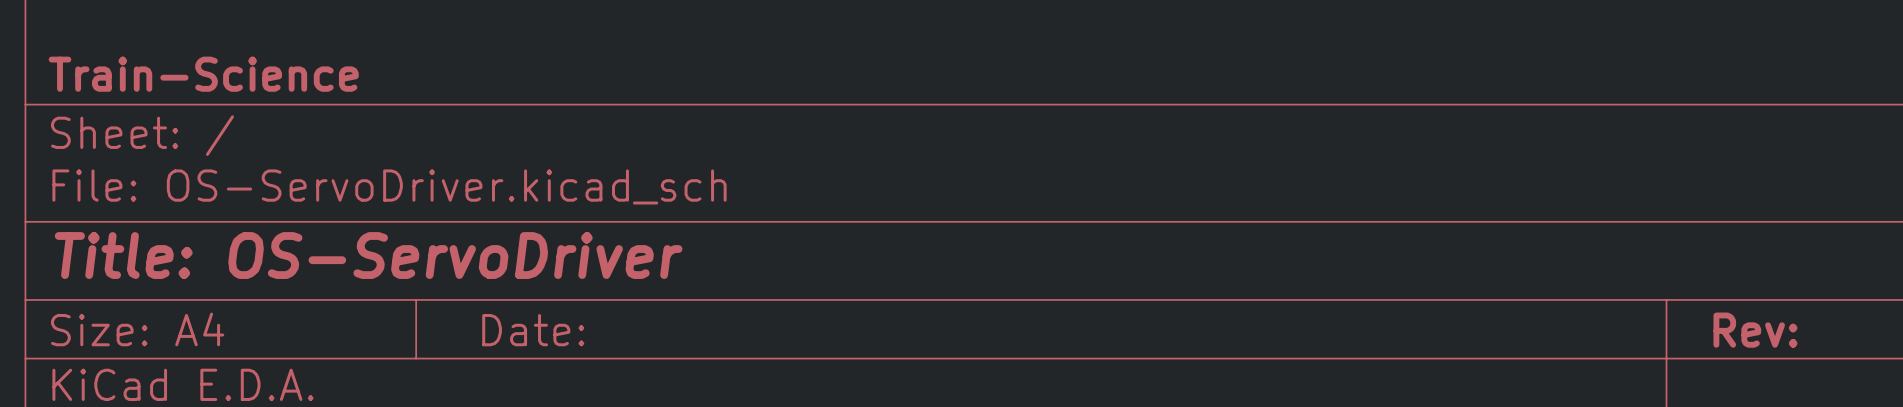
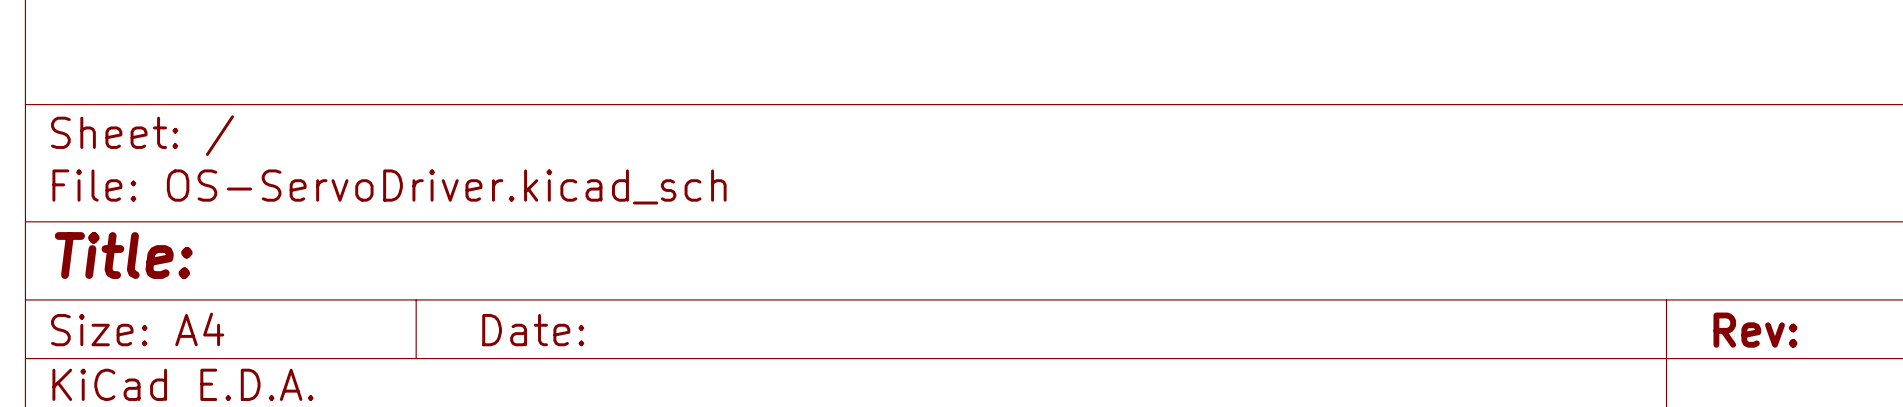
title block: Train-Science (203, 74) -> none
title block: Title: OS-ServoDriver (368, 255) -> Title: (123, 255)

